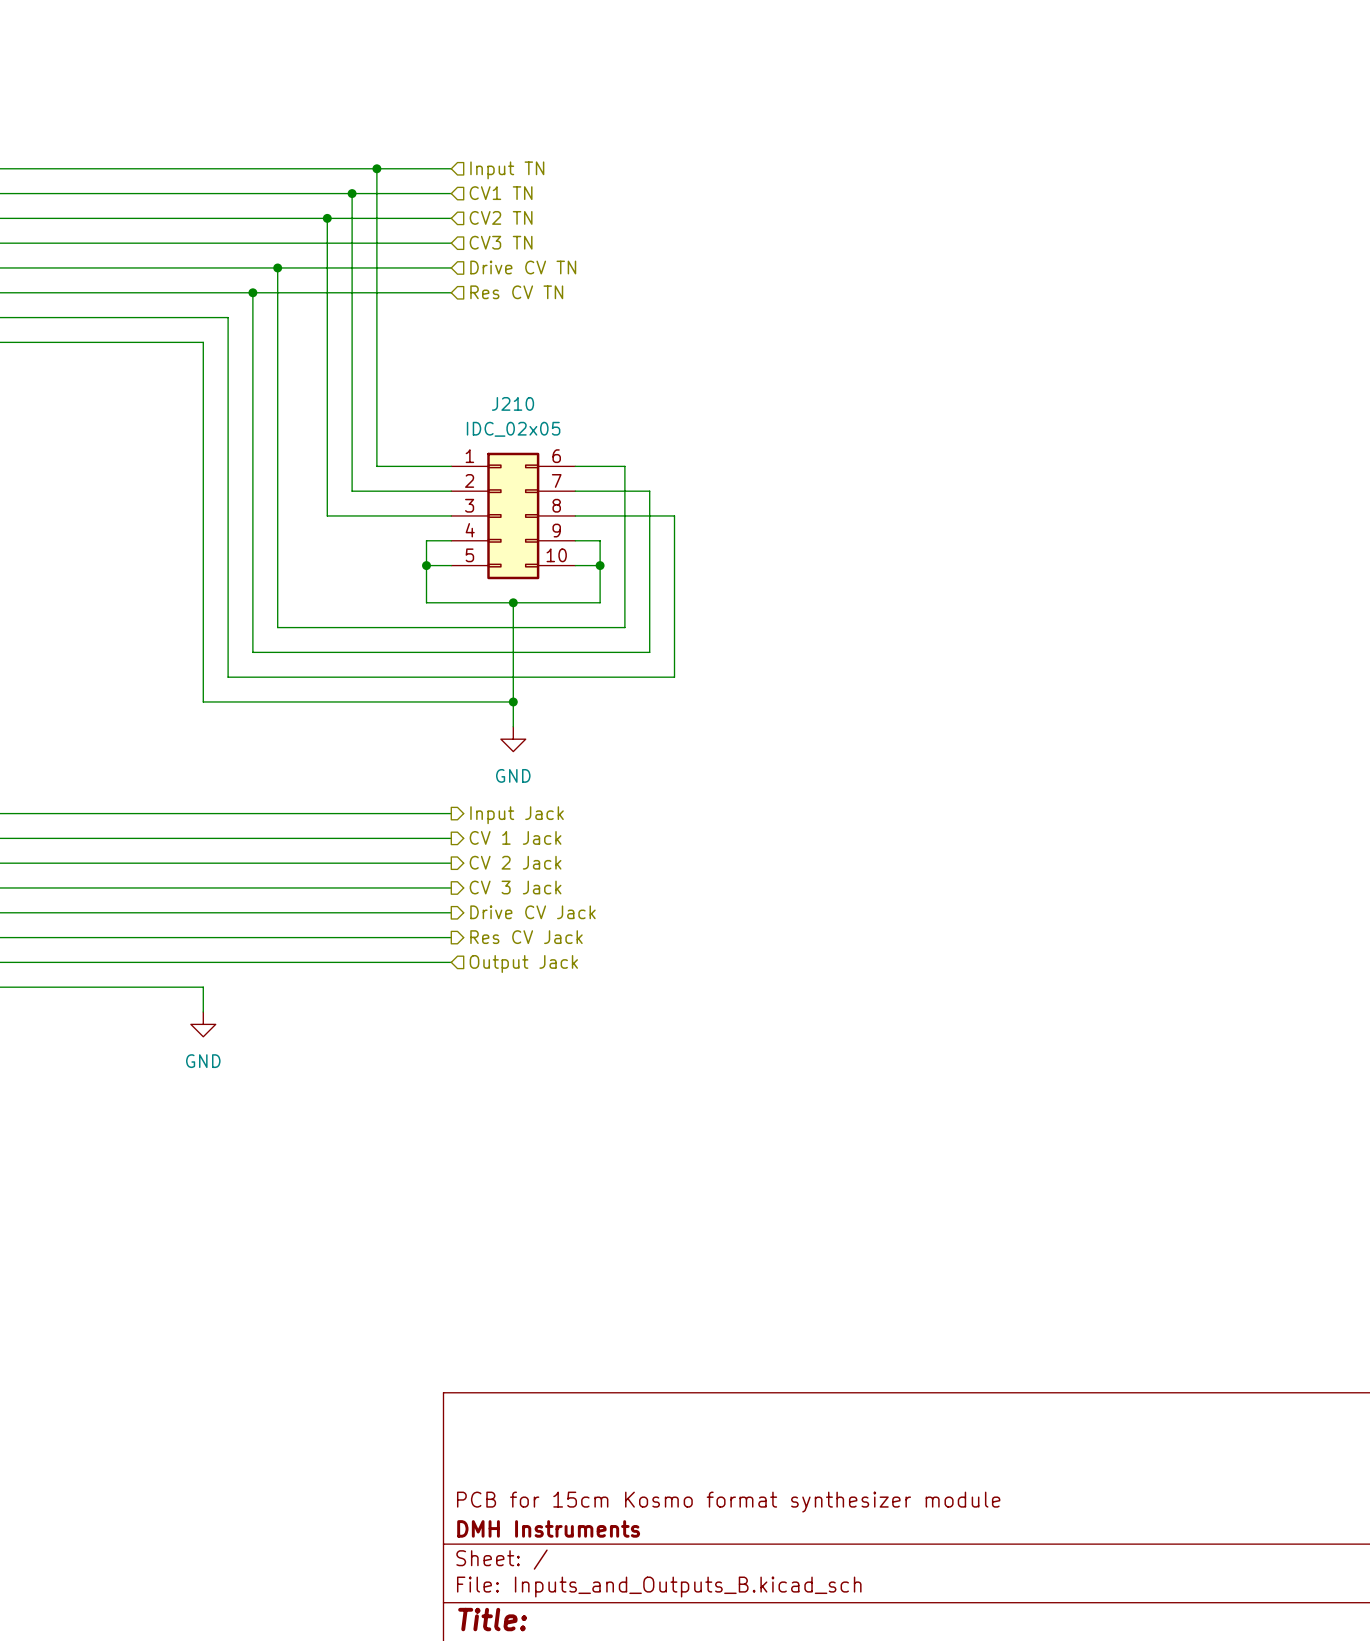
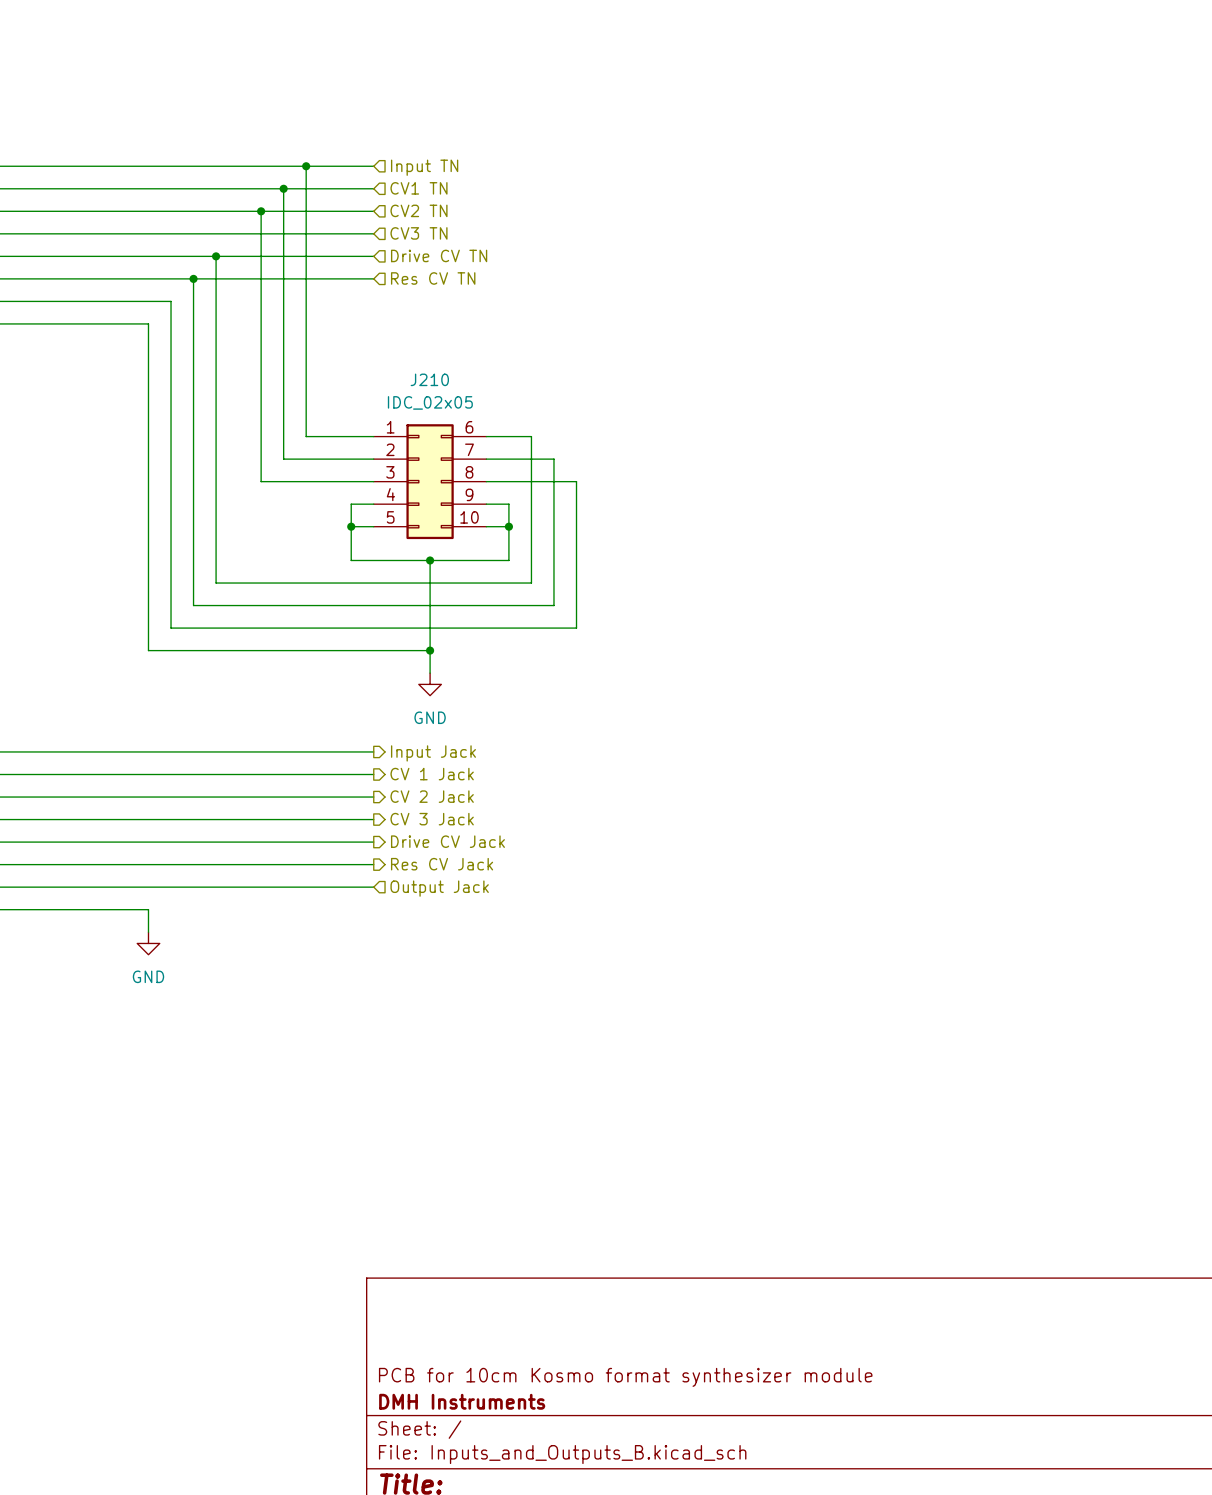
title block: PCB for 15cm Kosmo format synthesizer module (728, 1502) -> PCB for 10cm Kosmo format synthesizer module (625, 1377)

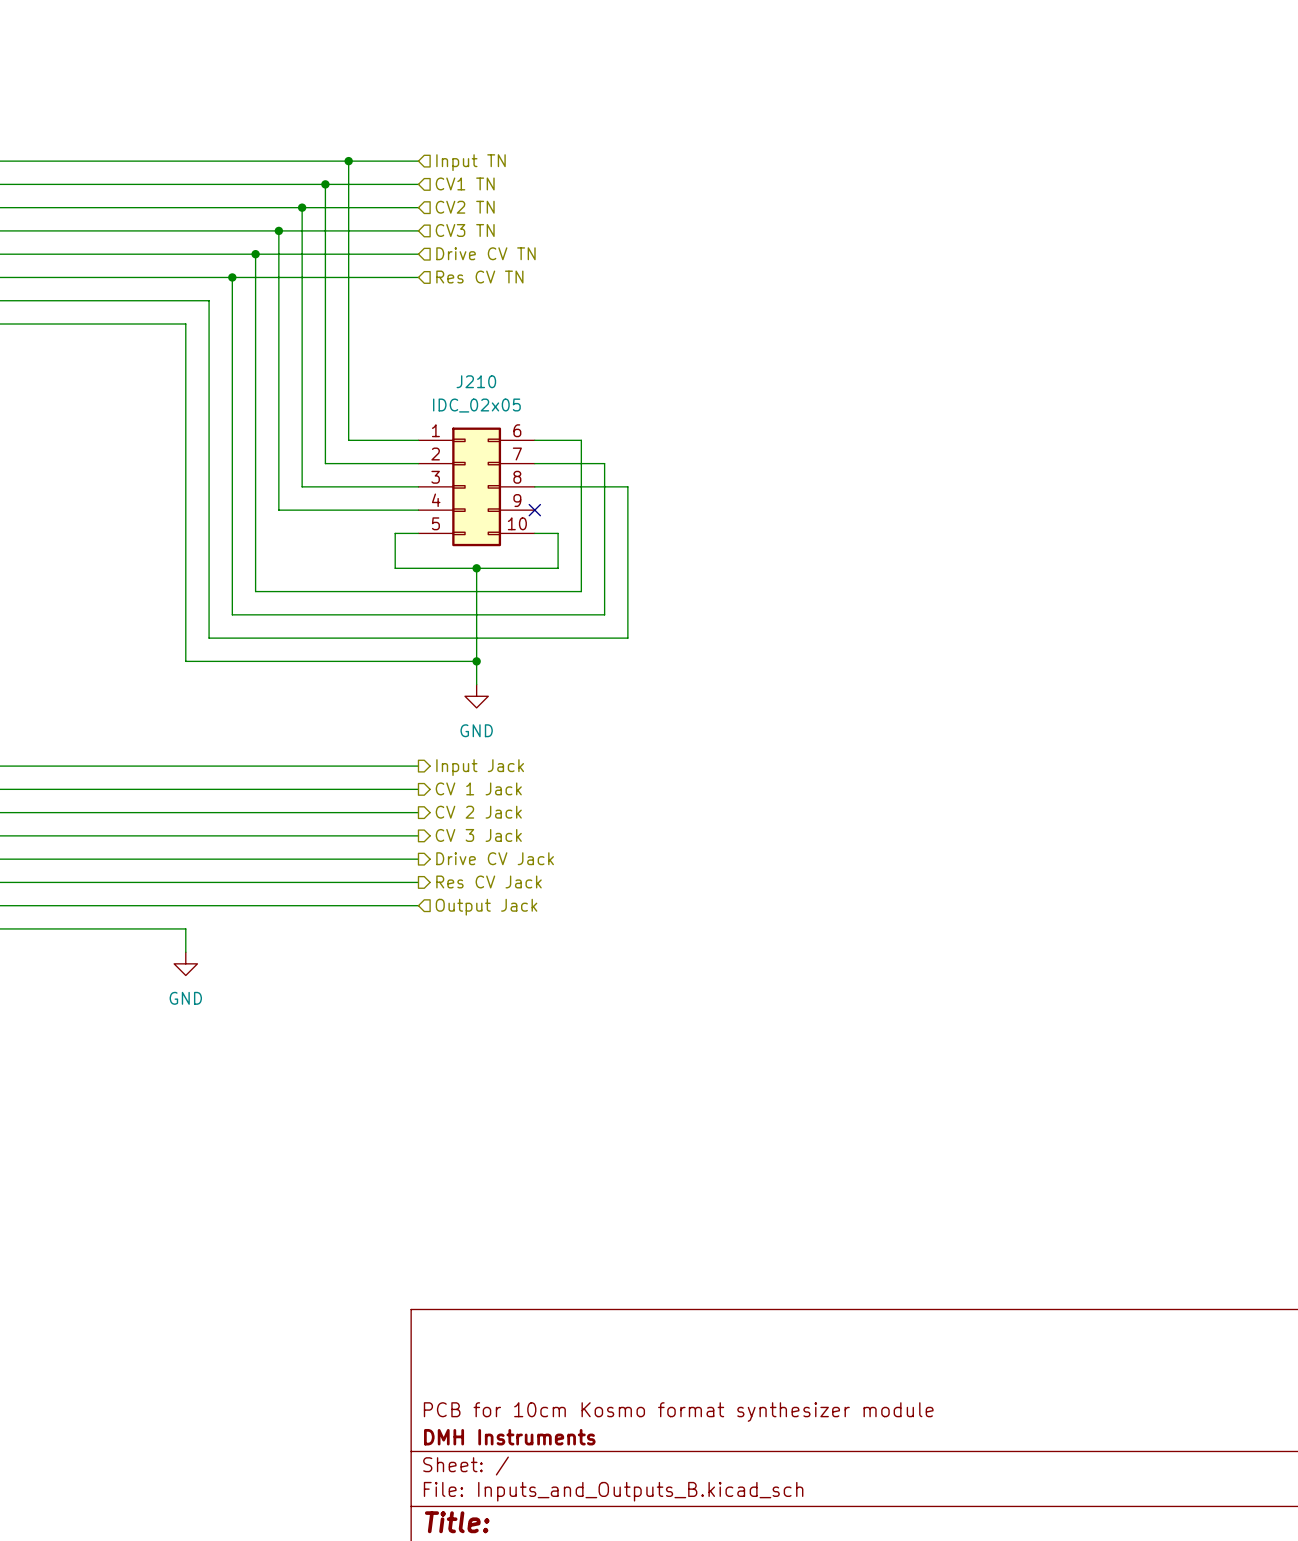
junction: none -> (278, 230)
wire: (351, 504) (351, 526) -> (395, 510) (278, 510) (278, 230)
wire: (486, 504) (508, 504) (508, 526) -> none
no-connect mark: none -> (534, 510)
junction: (351, 526) -> none
junction: (508, 526) -> none

